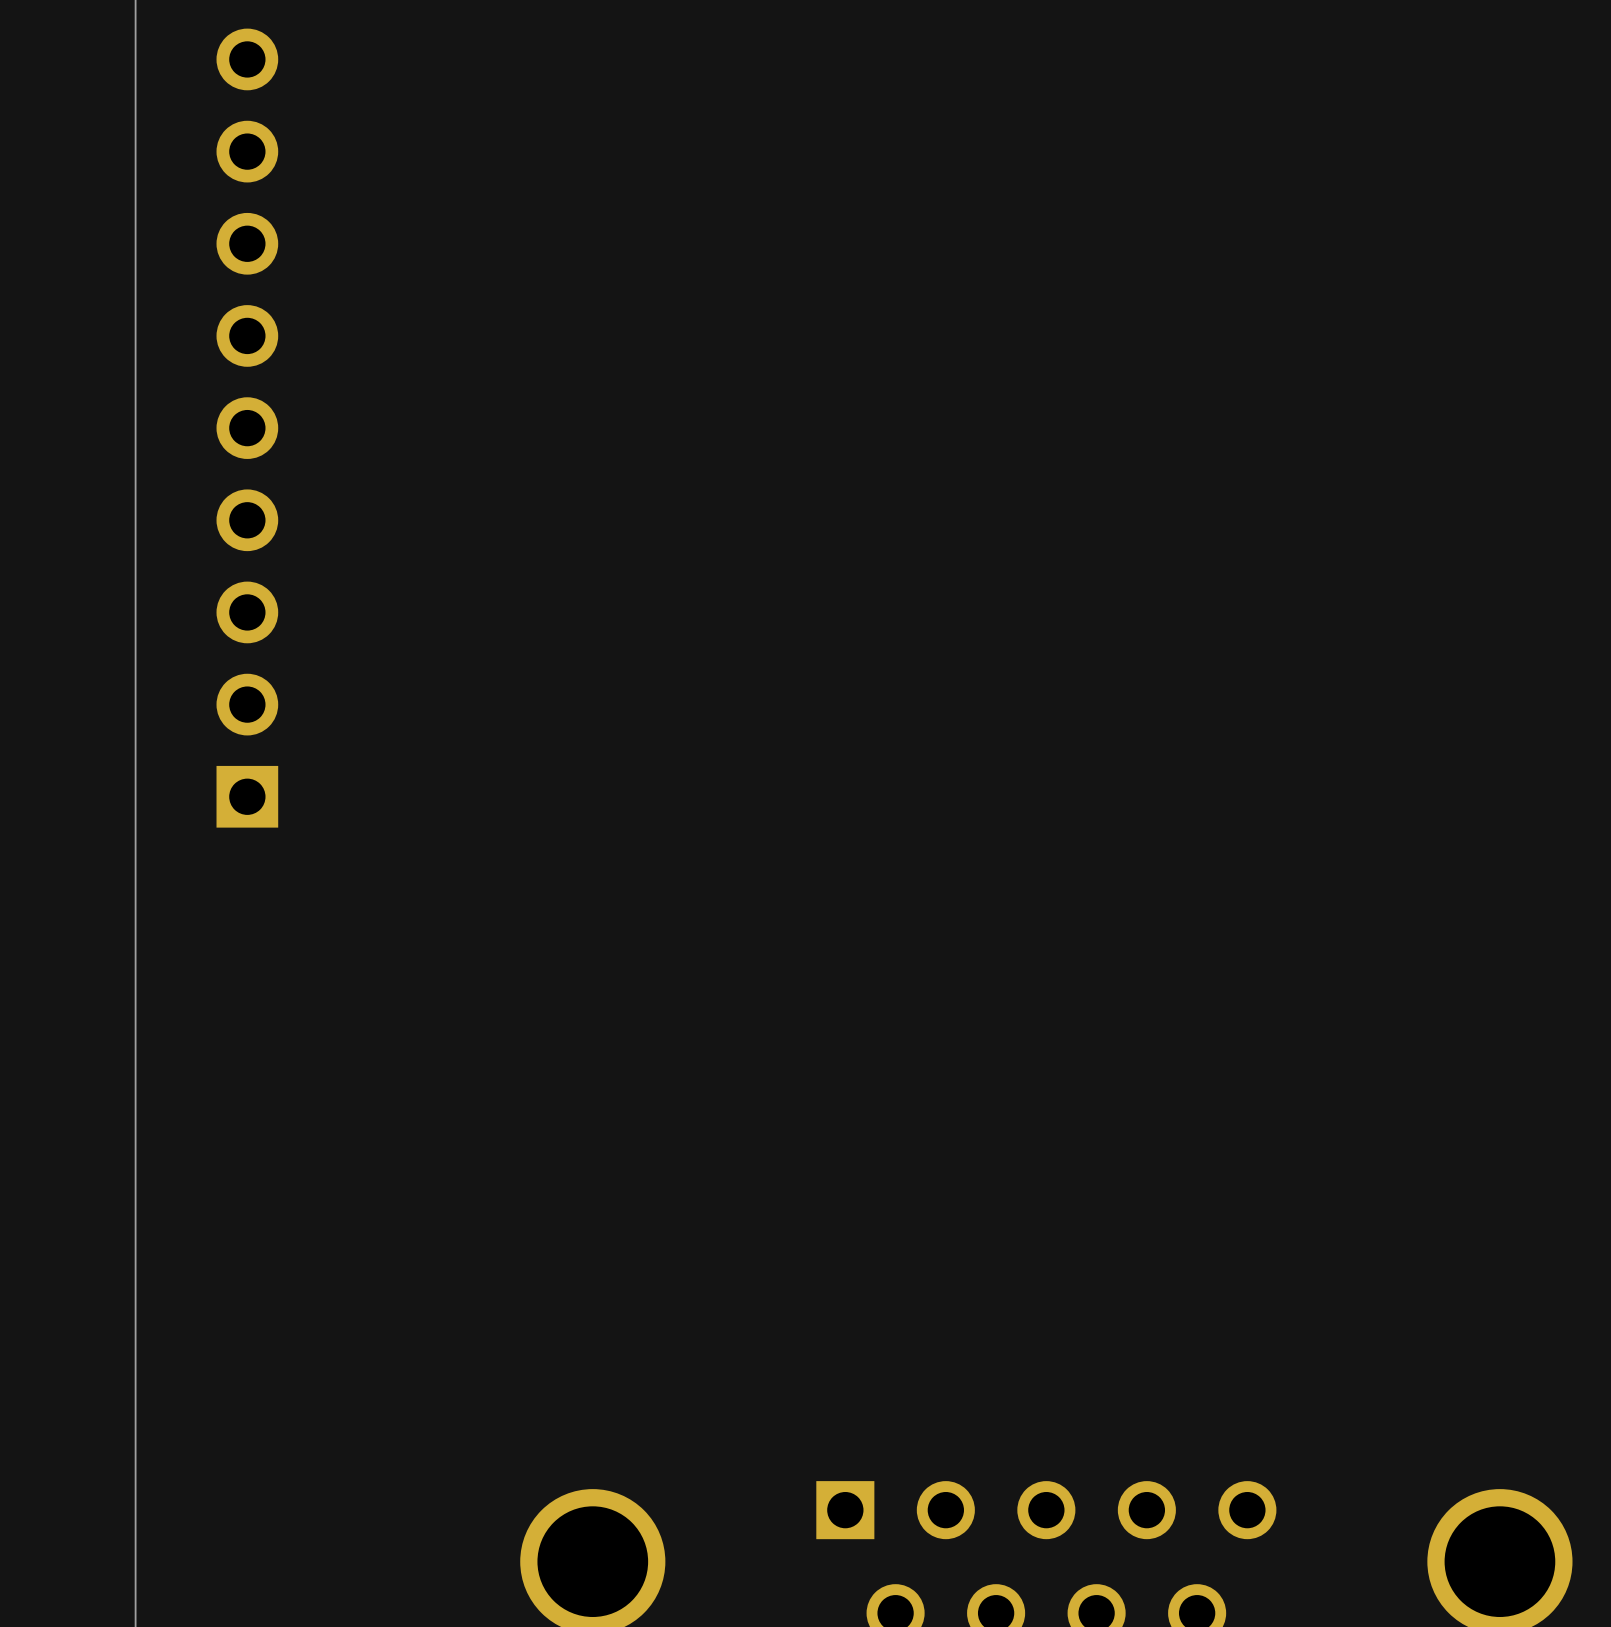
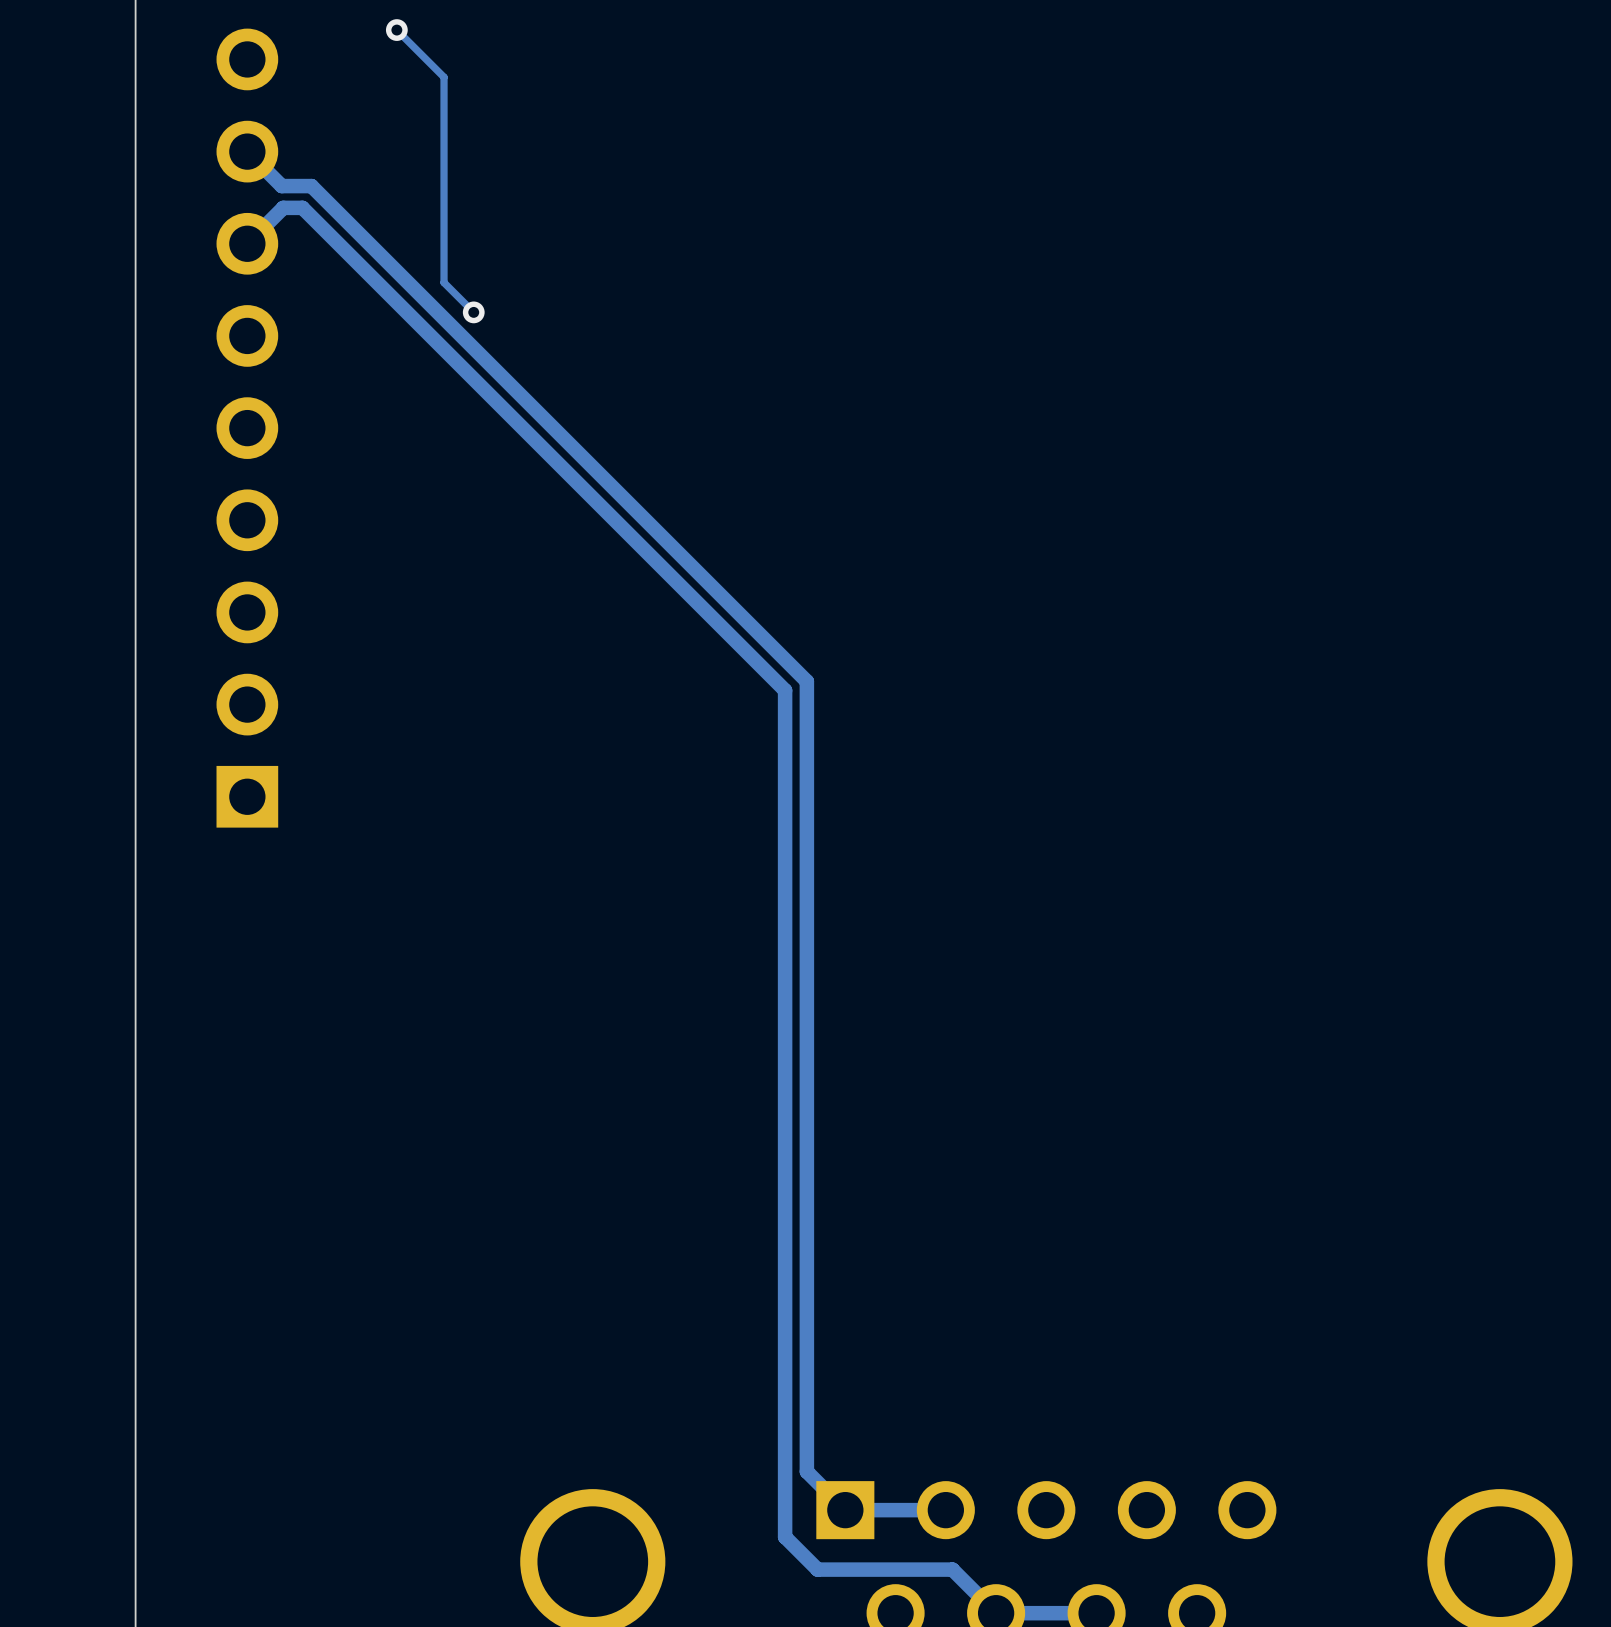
track: none -> (396, 30) (444, 77) (444, 282) (473, 312)
via: none -> (396, 30)
track: none -> (247, 151) (281, 186) (311, 186) (806, 681) (806, 1471) (845, 1510) (945, 1510)
track: none -> (247, 243) (283, 207) (302, 207) (785, 690) (785, 1537) (817, 1569) (952, 1569) (996, 1613) (1096, 1613)
via: none -> (473, 312)

